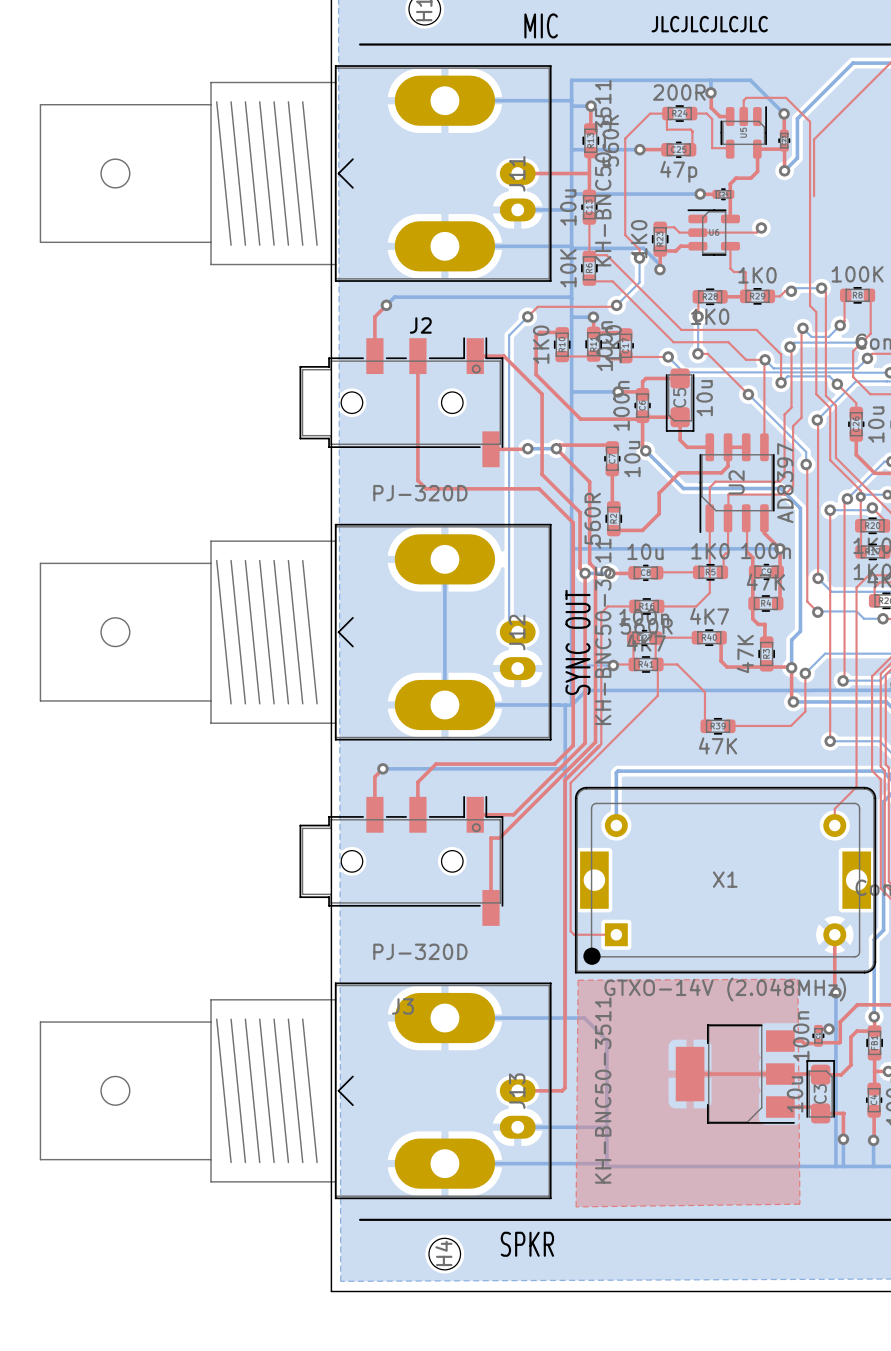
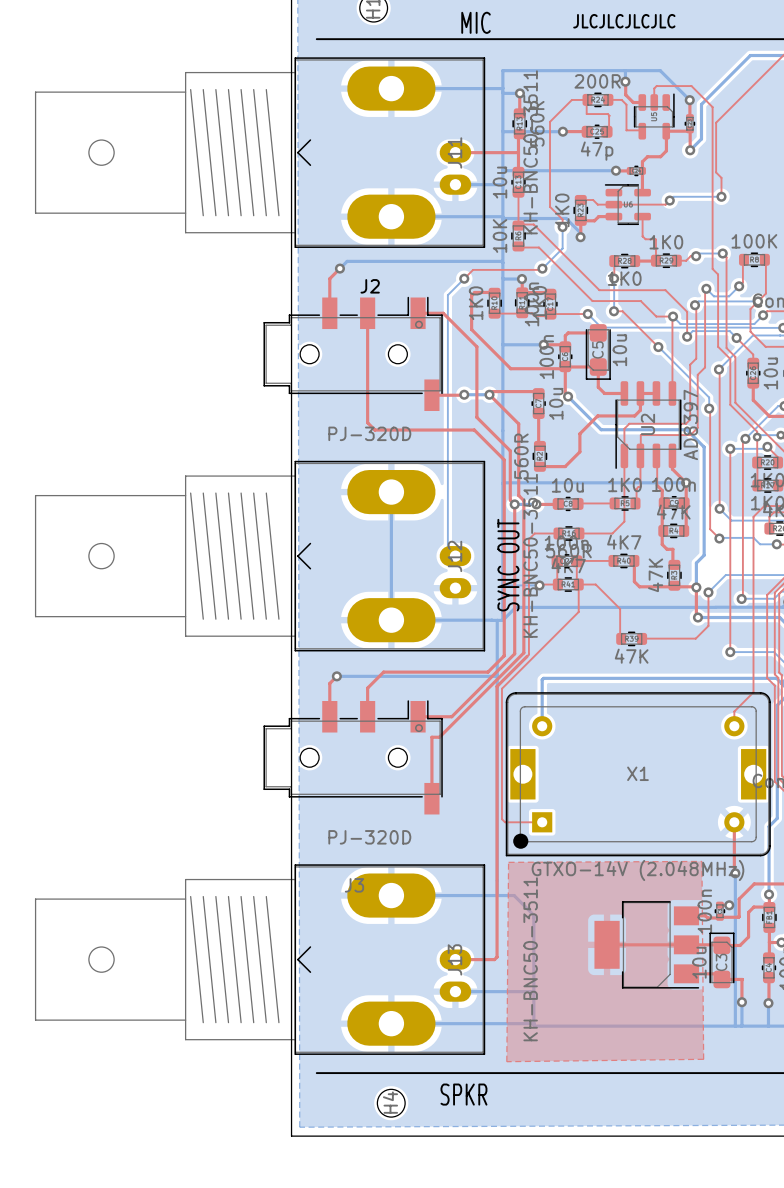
top track: none -> (716, 172) (721, 177) (721, 196)
bottom track: none -> (721, 196) (673, 196) (669, 200)
via: none -> (721, 196)

